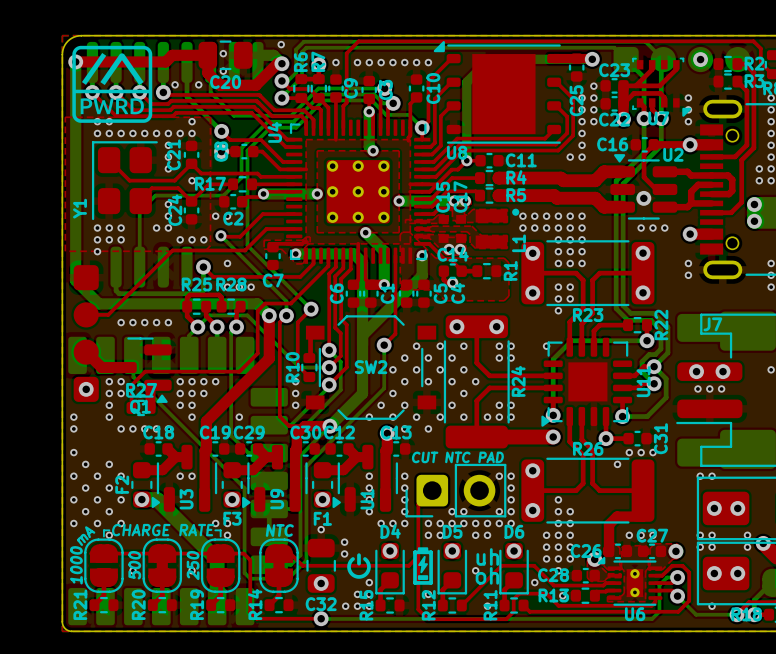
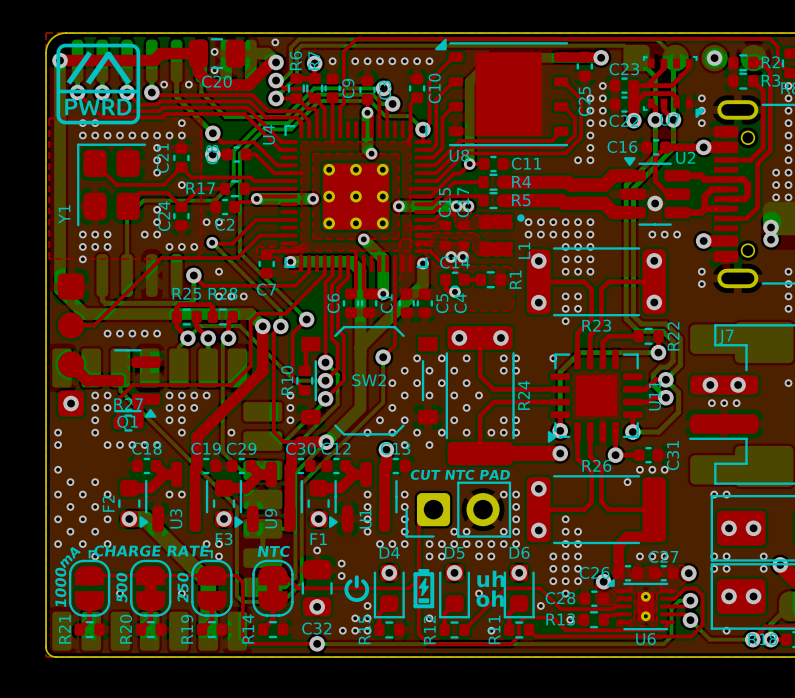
via: none -> (788, 85)
via: none -> (776, 197)
via: none -> (788, 197)
via position: (754, 204) -> (771, 239)
via: none -> (788, 308)

